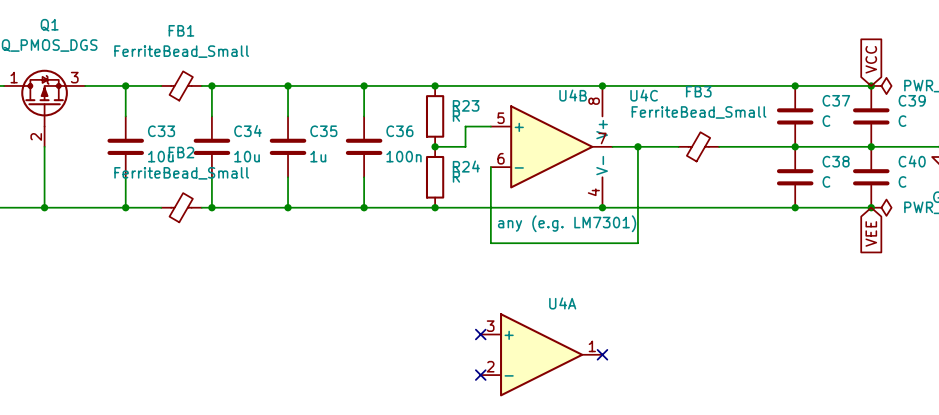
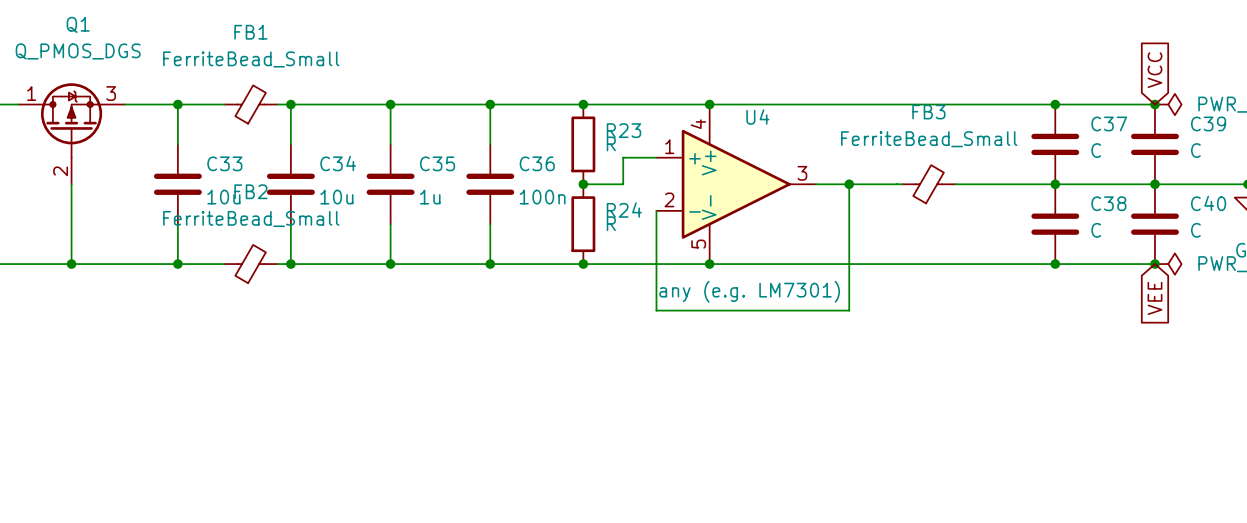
junction: none -> (709, 104)
junction: (602, 85) -> none
U4B: any (e.g. LM7301) (551, 146) -> none
U4: none -> any (e.g. LM7301) (736, 184)
U4C: (602, 146) -> none
junction: none -> (709, 264)
junction: (602, 207) -> none
no-connect mark: (480, 334) -> none
U4A: (541, 354) -> none
no-connect mark: (602, 354) -> none
no-connect mark: (480, 375) -> none

